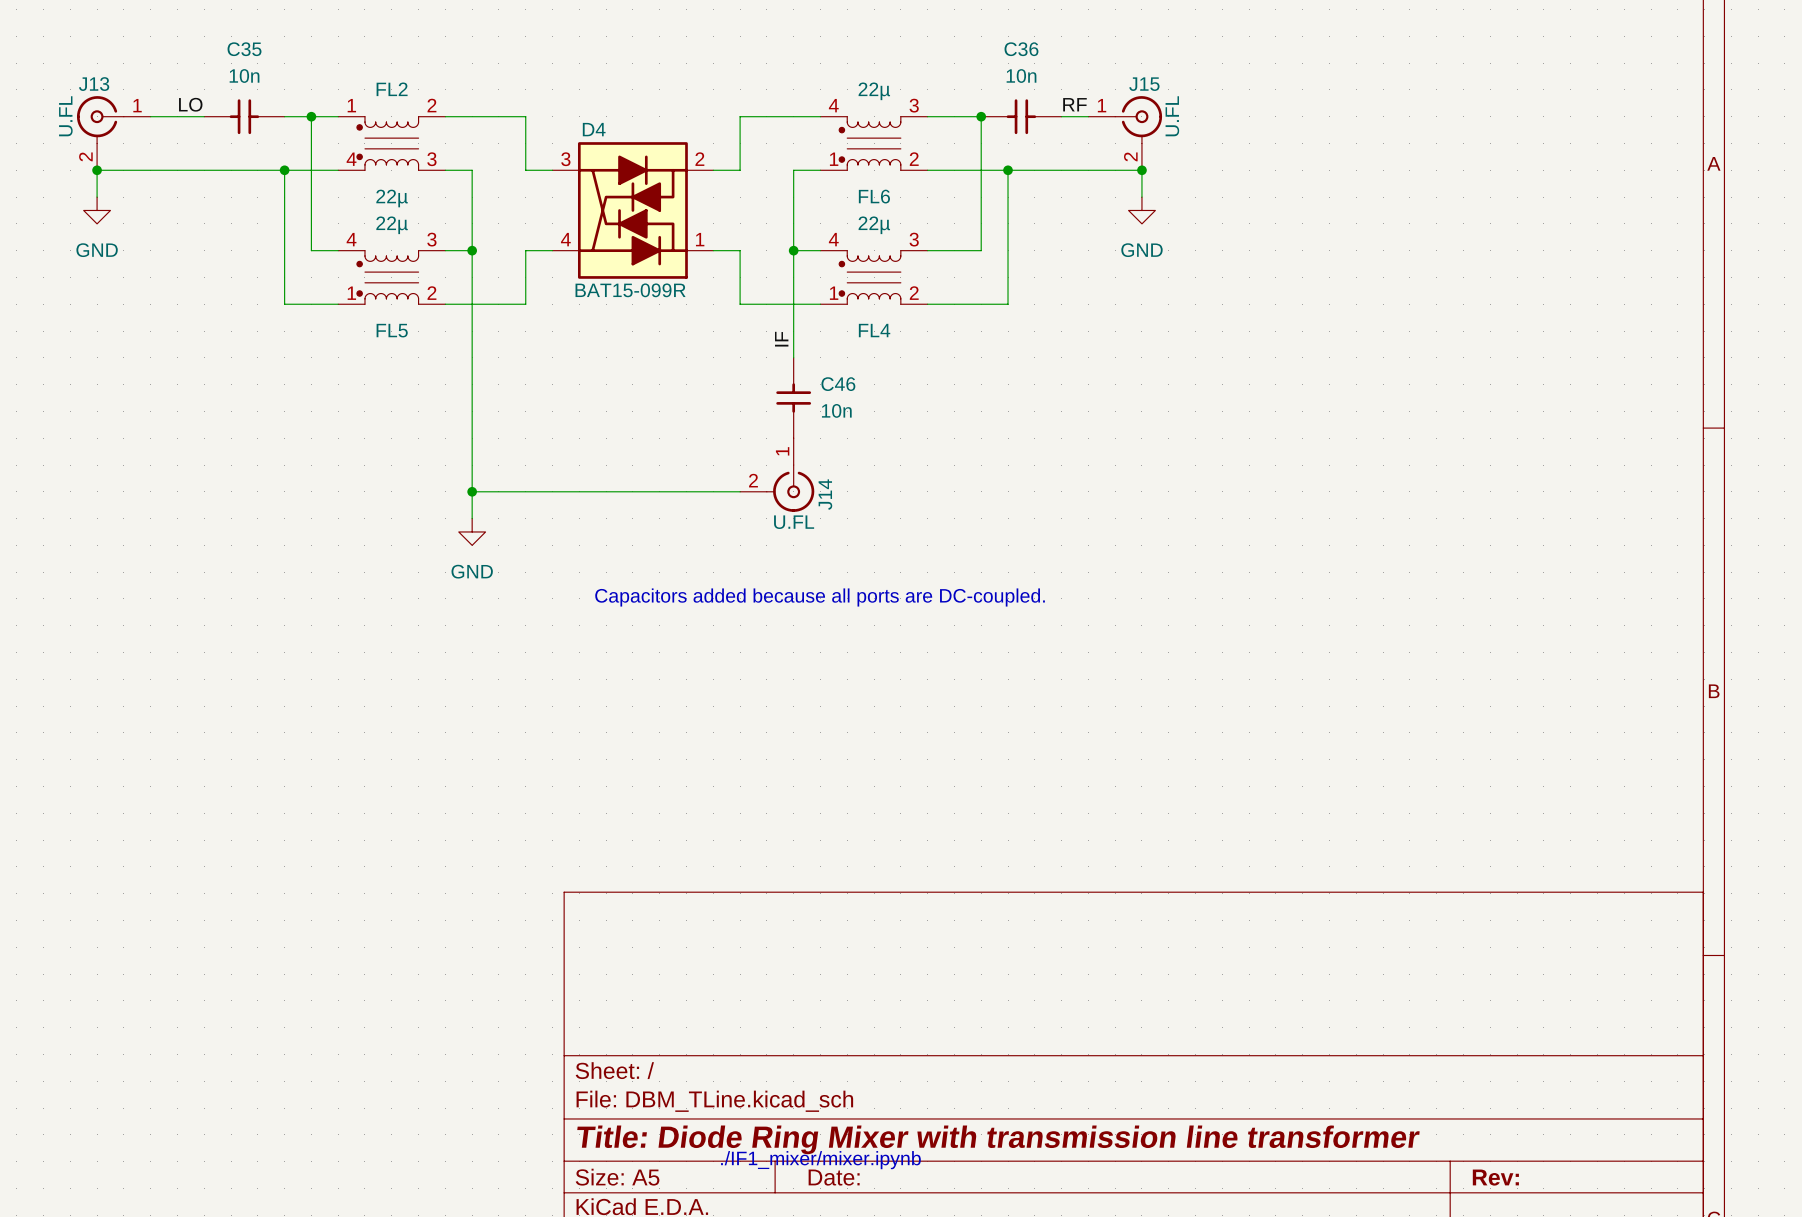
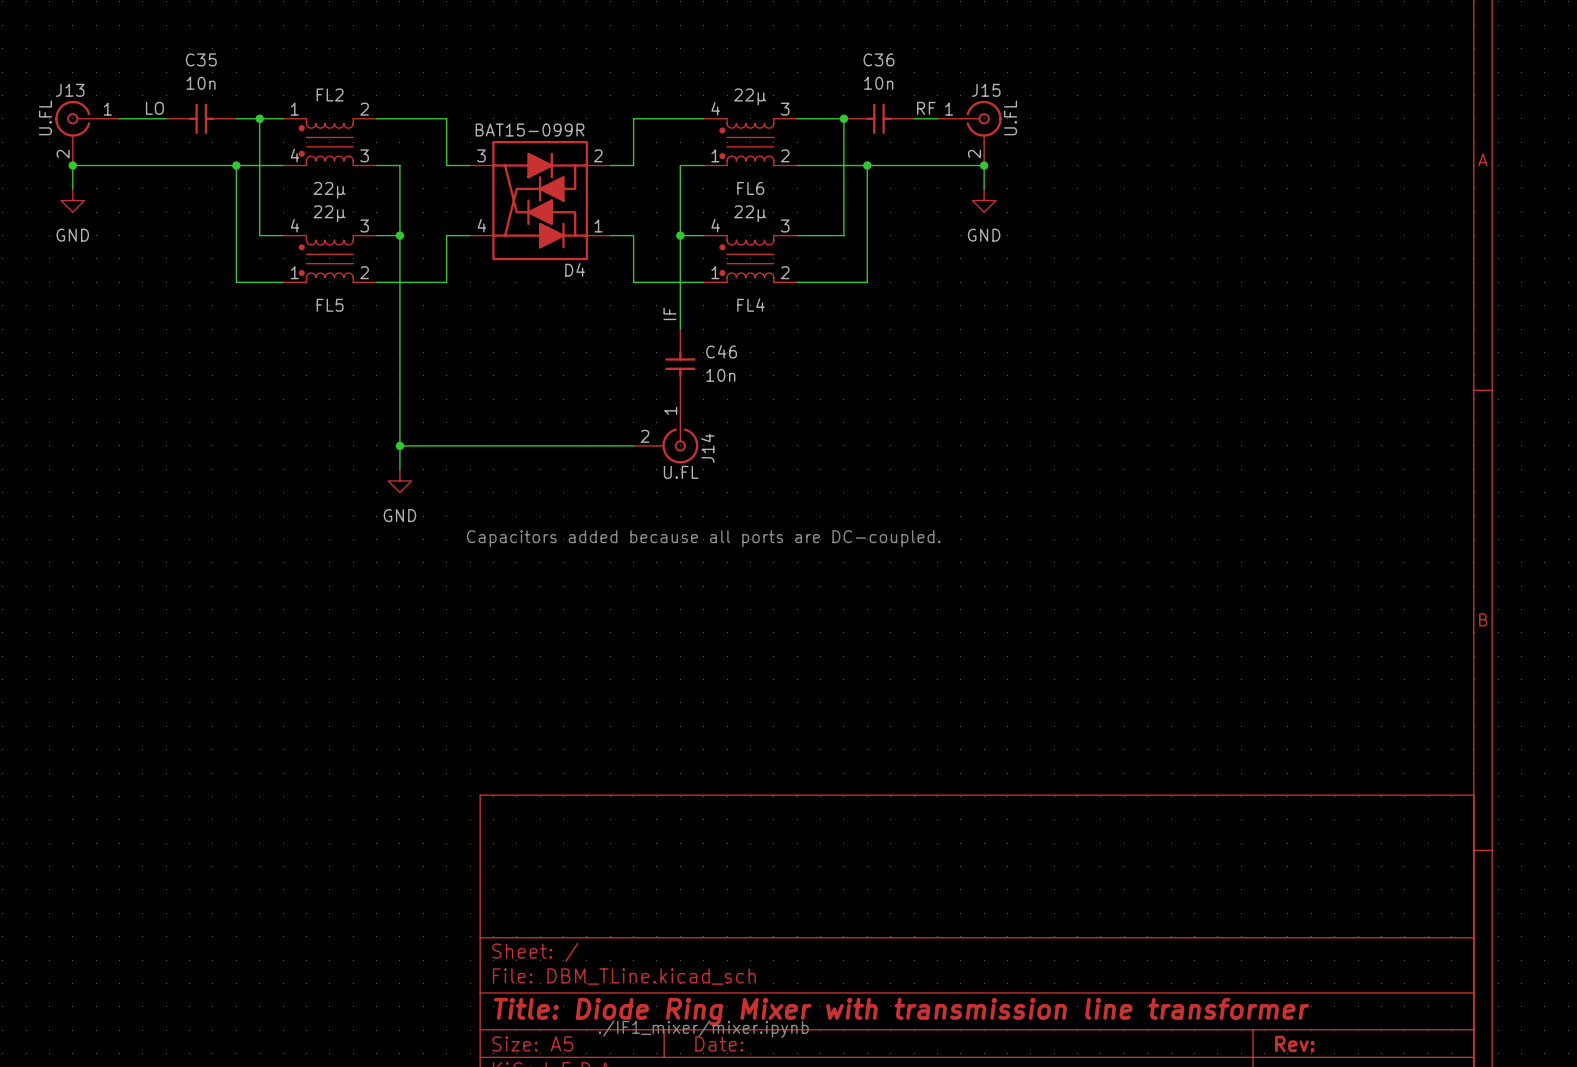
D4 name position: D4 (594, 129) -> D4 (575, 269)
D4 value position: BAT15-099R (630, 290) -> BAT15-099R (530, 130)

